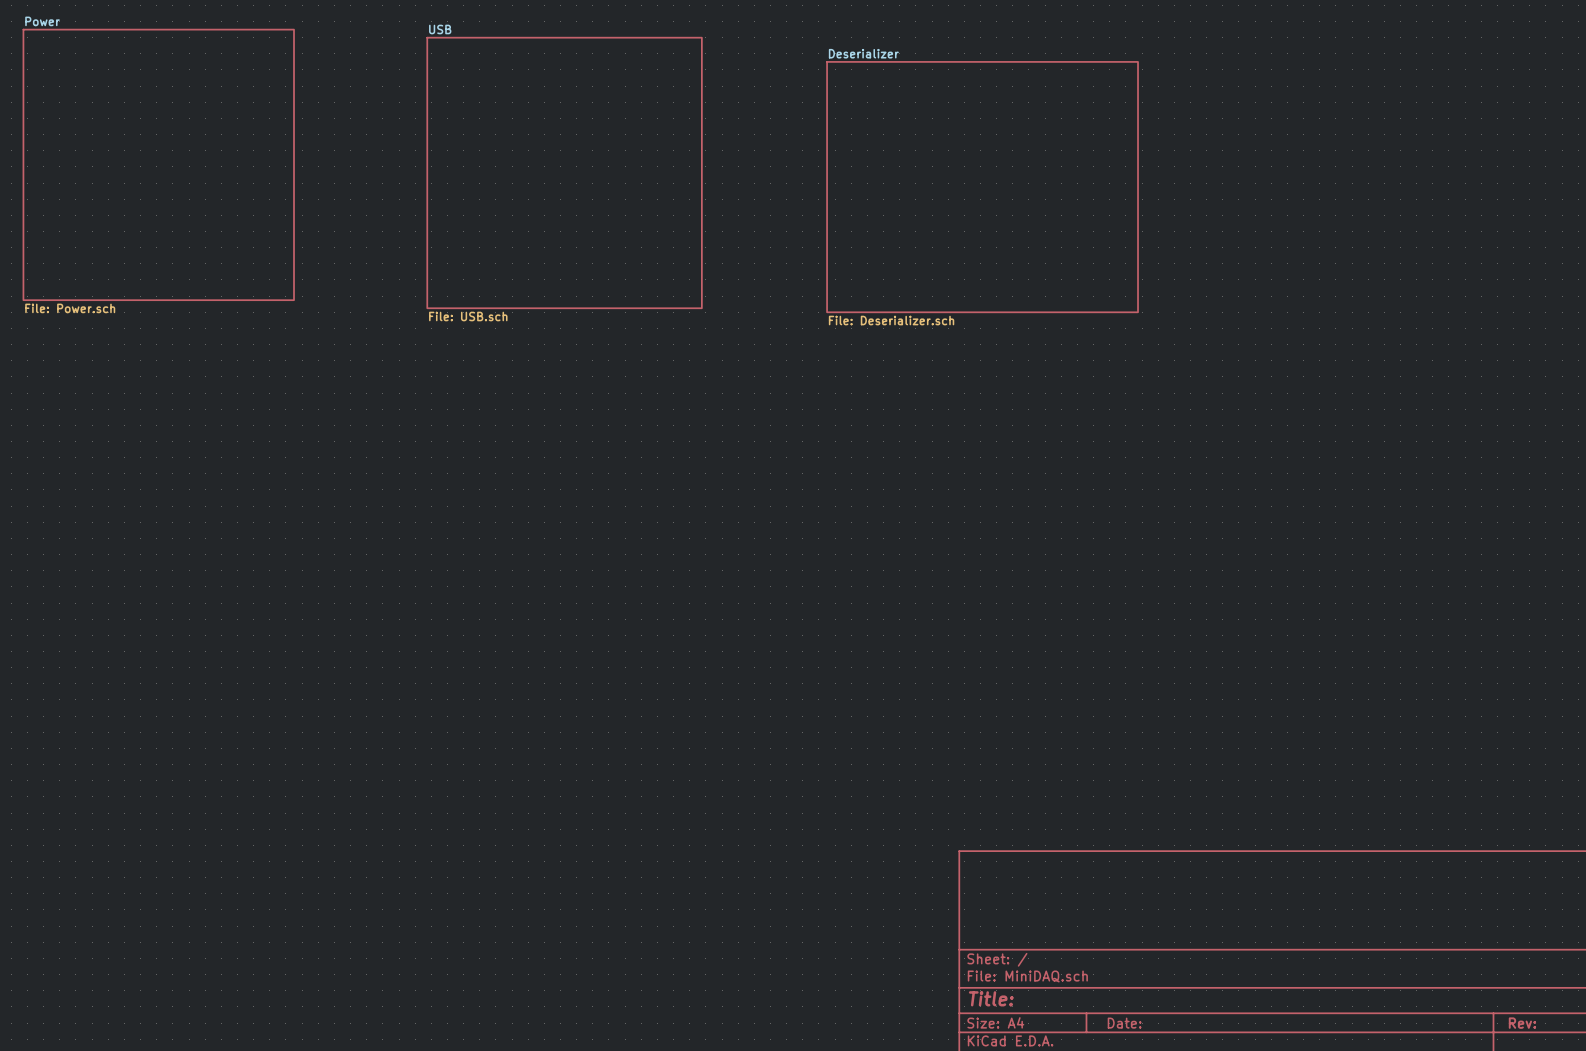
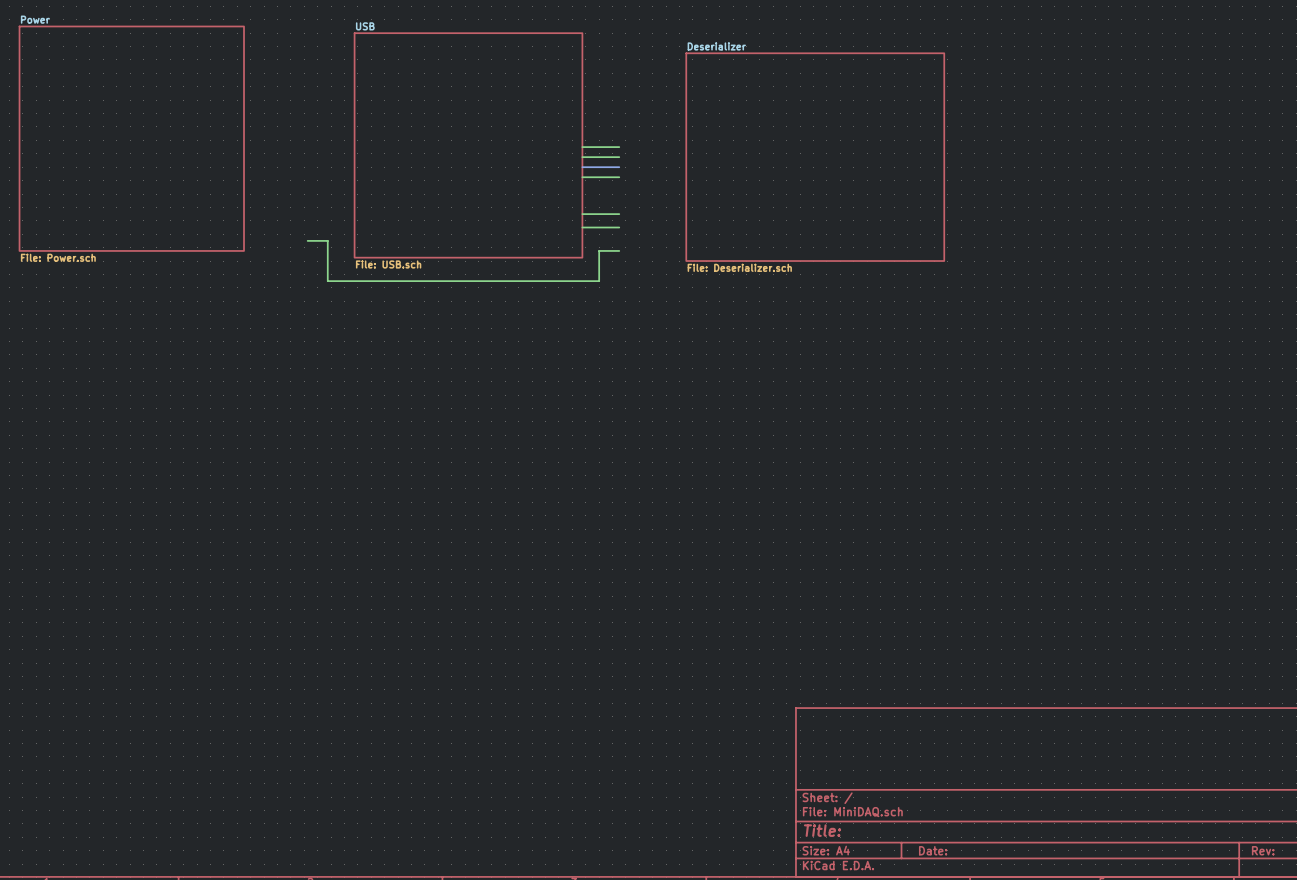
wire: none -> (582, 147) (619, 147)
wire: none -> (582, 157) (619, 157)
bus: none -> (582, 167) (619, 167)
wire: none -> (582, 177) (619, 177)
wire: none -> (582, 214) (619, 214)
wire: none -> (582, 227) (619, 227)
wire: none -> (307, 240) (327, 240) (327, 281) (599, 281) (599, 250) (619, 250)

